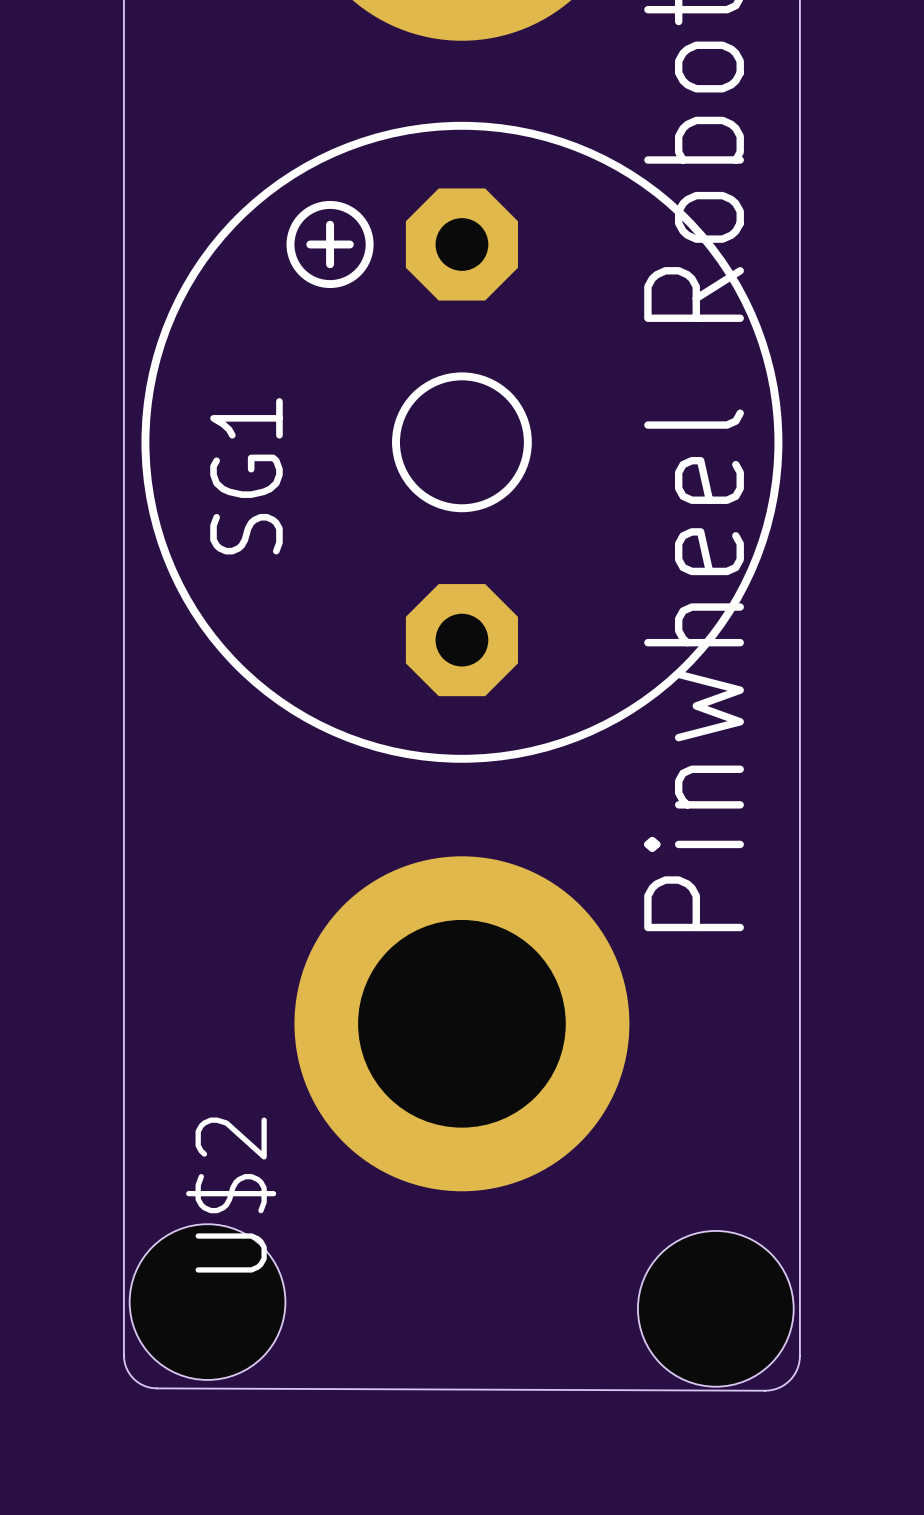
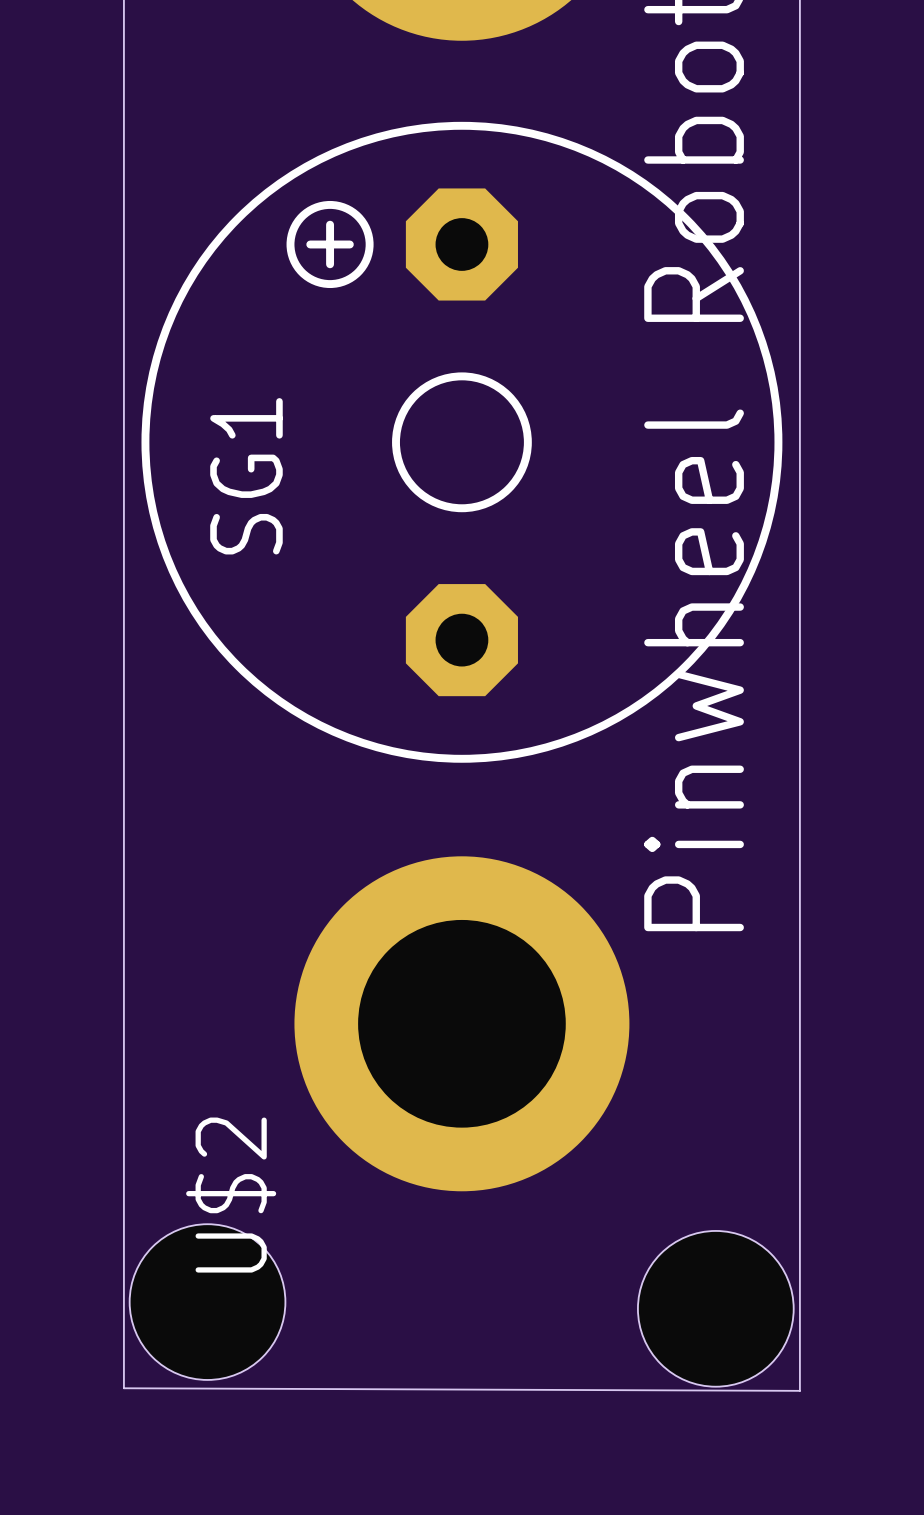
board edge: (123, 1355) (126, 1368) (133, 1378) (144, 1385) (156, 1388) -> (123, 1355) (123, 1388) (156, 1388)
board edge: (799, 1356) (797, 1367) (789, 1380) (776, 1388) (765, 1390) -> (799, 1356) (799, 1390) (765, 1390)

